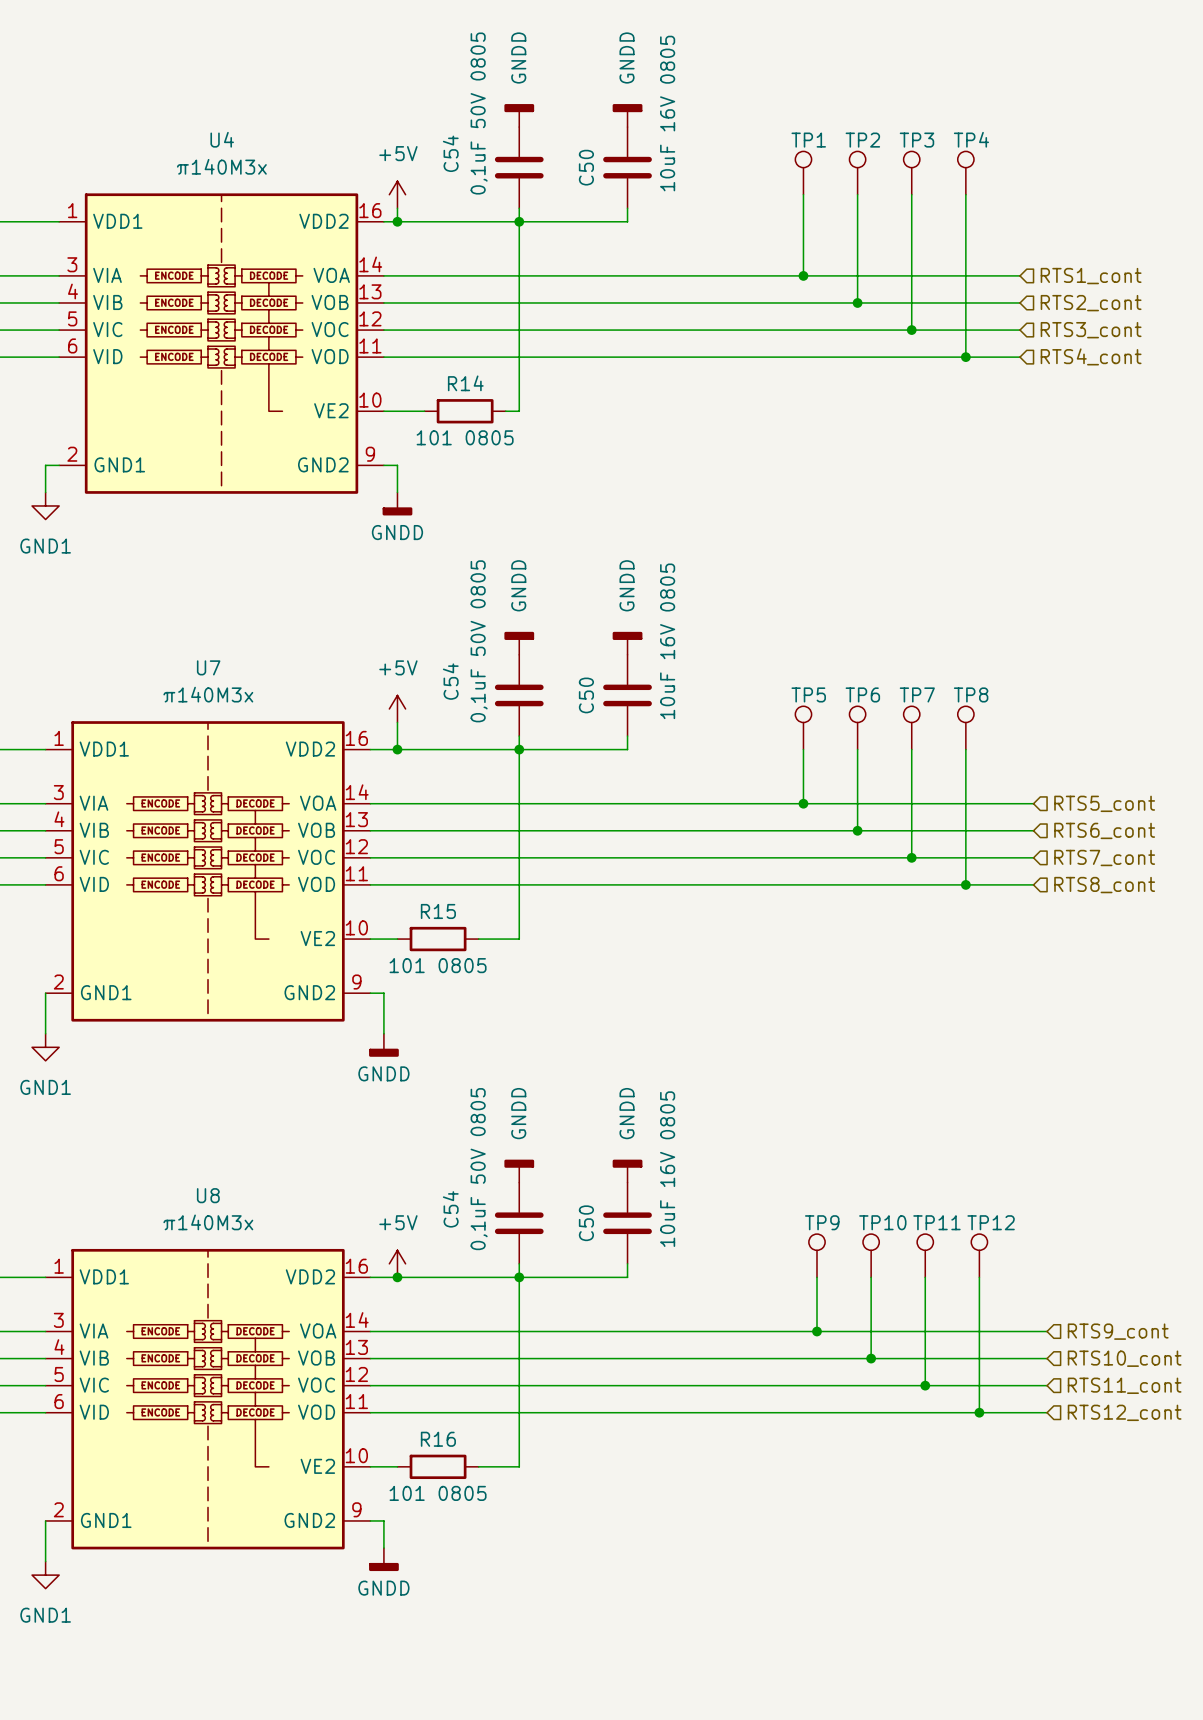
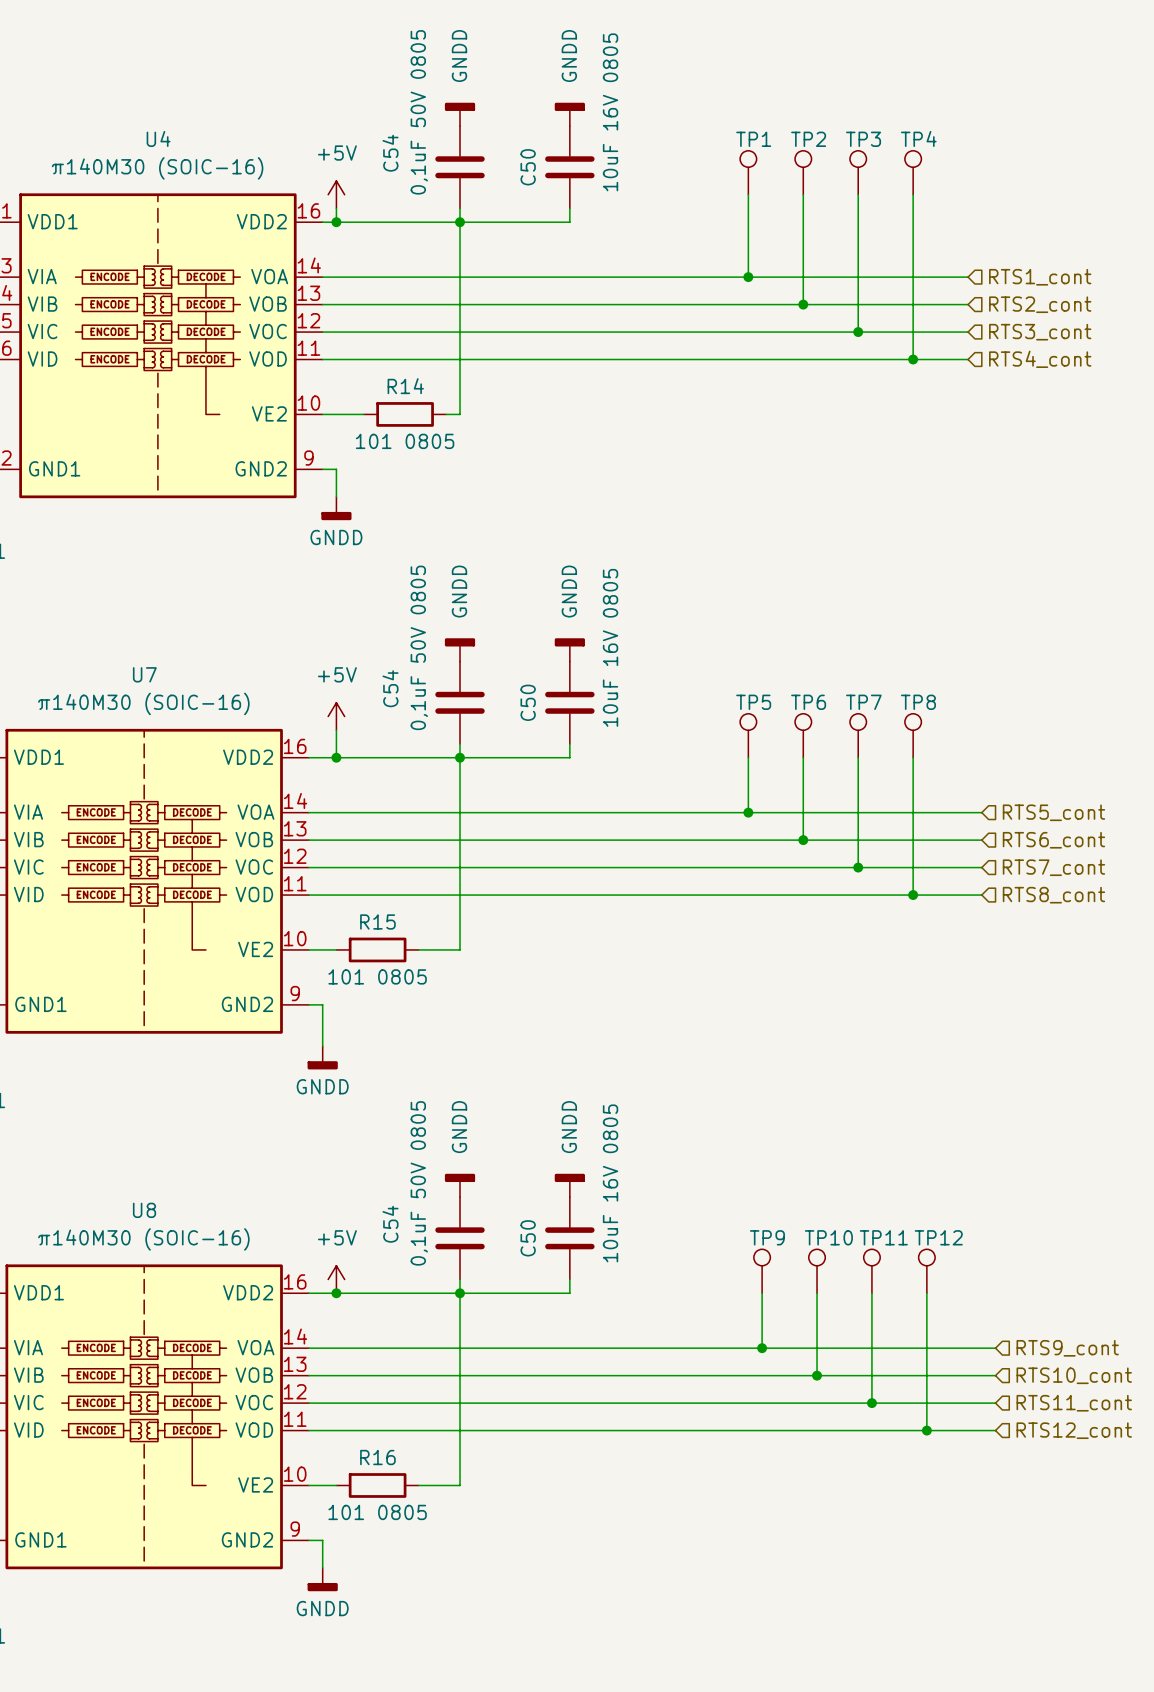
U4 value: π140M3x (221, 166) -> π140M30 (SOIC-16) (157, 168)
U7 value: π140M3x (208, 694) -> π140M30 (SOIC-16) (143, 703)
U8 value: π140M3x (208, 1222) -> π140M30 (SOIC-16) (143, 1239)

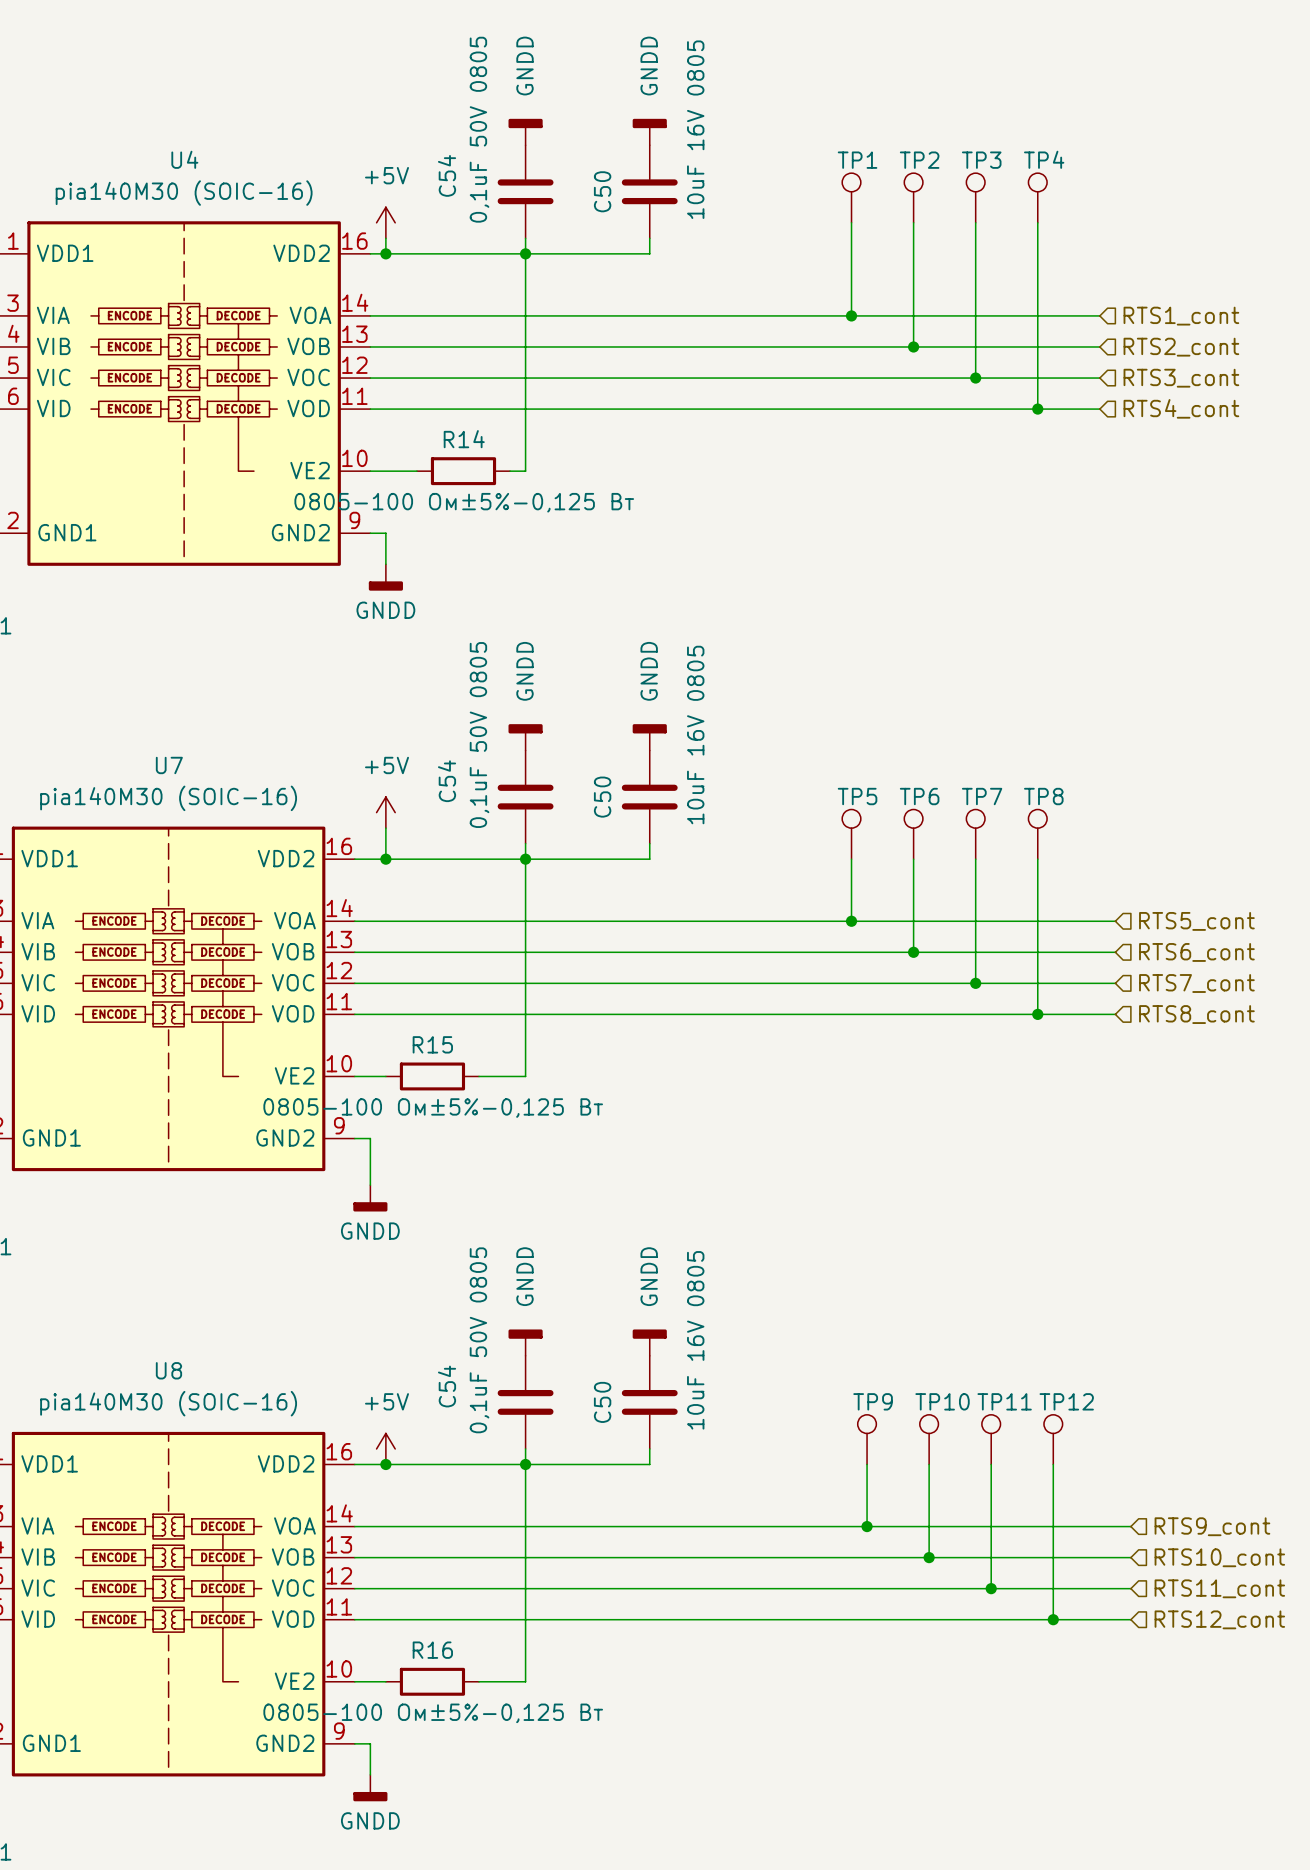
U4 value: π140M30 (SOIC-16) (157, 168) -> pia140M30 (SOIC-16) (184, 193)
R14 value: 101 0805 (405, 441) -> 0805-100 Ом±5%-0,125 Вт (464, 502)
U7 value: π140M30 (SOIC-16) (143, 703) -> pia140M30 (SOIC-16) (168, 798)
R15 value: 101 0805 (377, 976) -> 0805-100 Ом±5%-0,125 Вт (433, 1108)
U8 value: π140M30 (SOIC-16) (143, 1239) -> pia140M30 (SOIC-16) (168, 1403)
R16 value: 101 0805 (377, 1512) -> 0805-100 Ом±5%-0,125 Вт (433, 1713)

